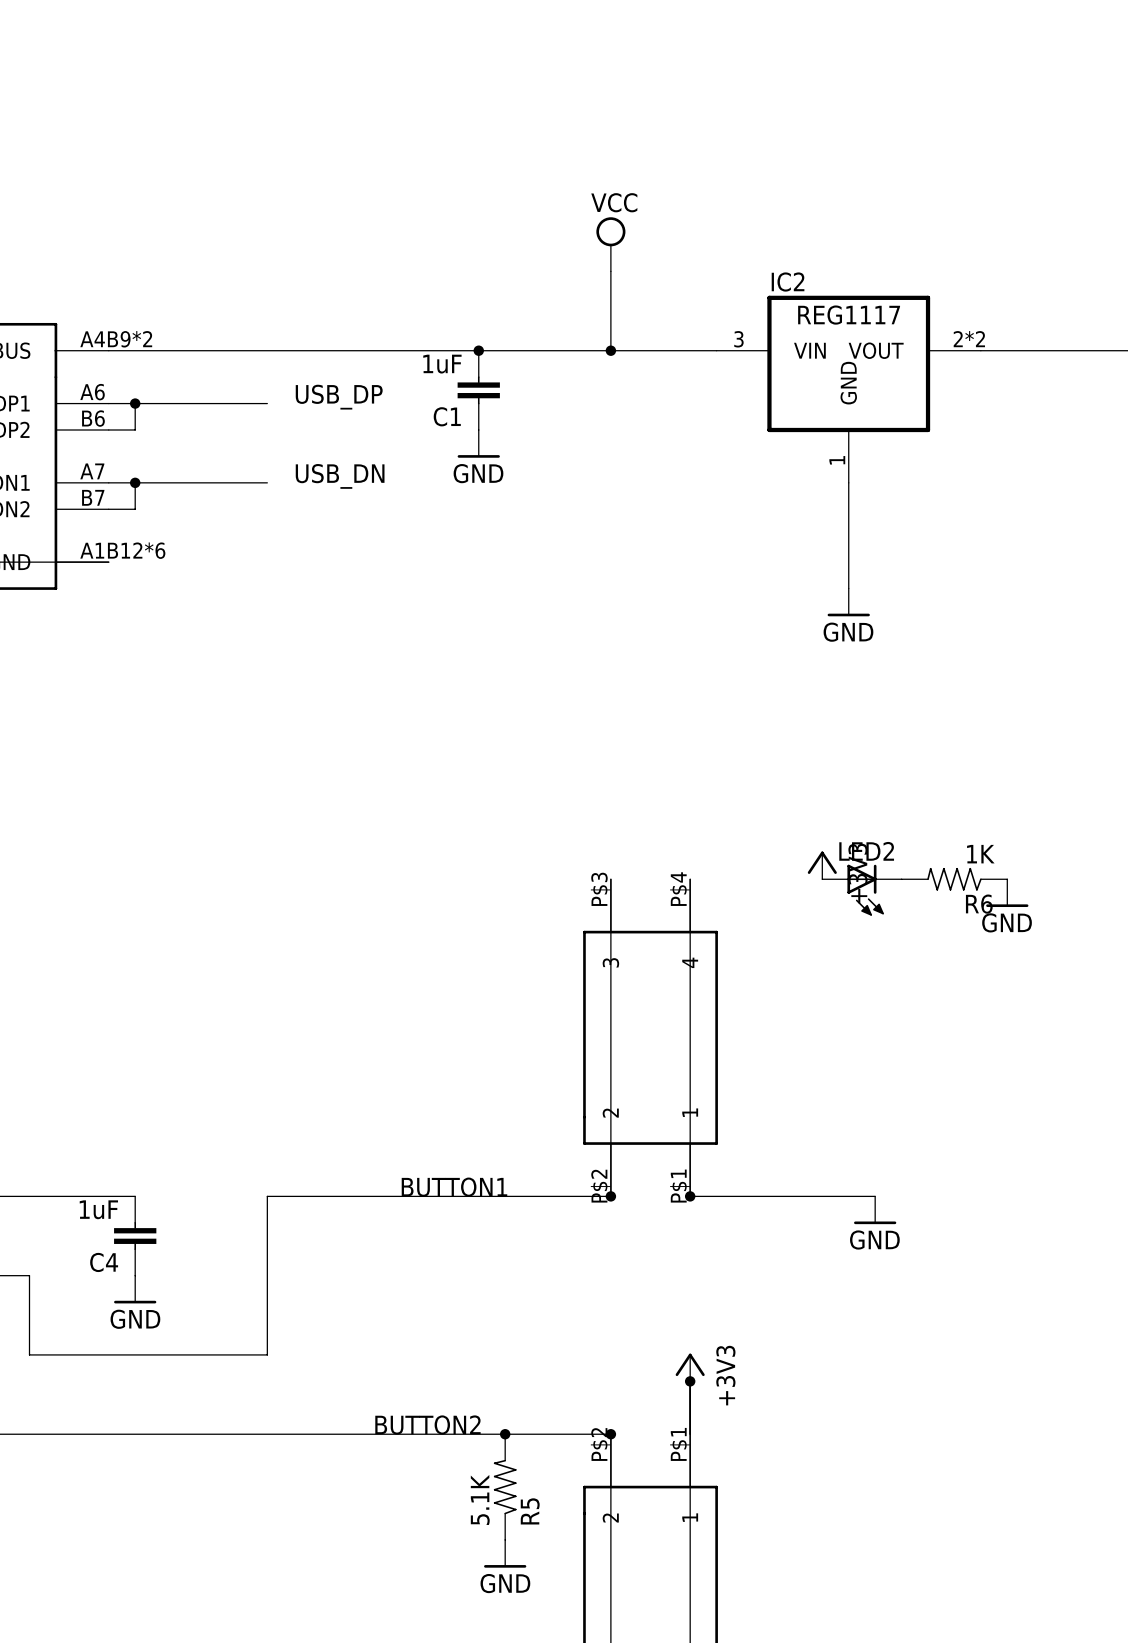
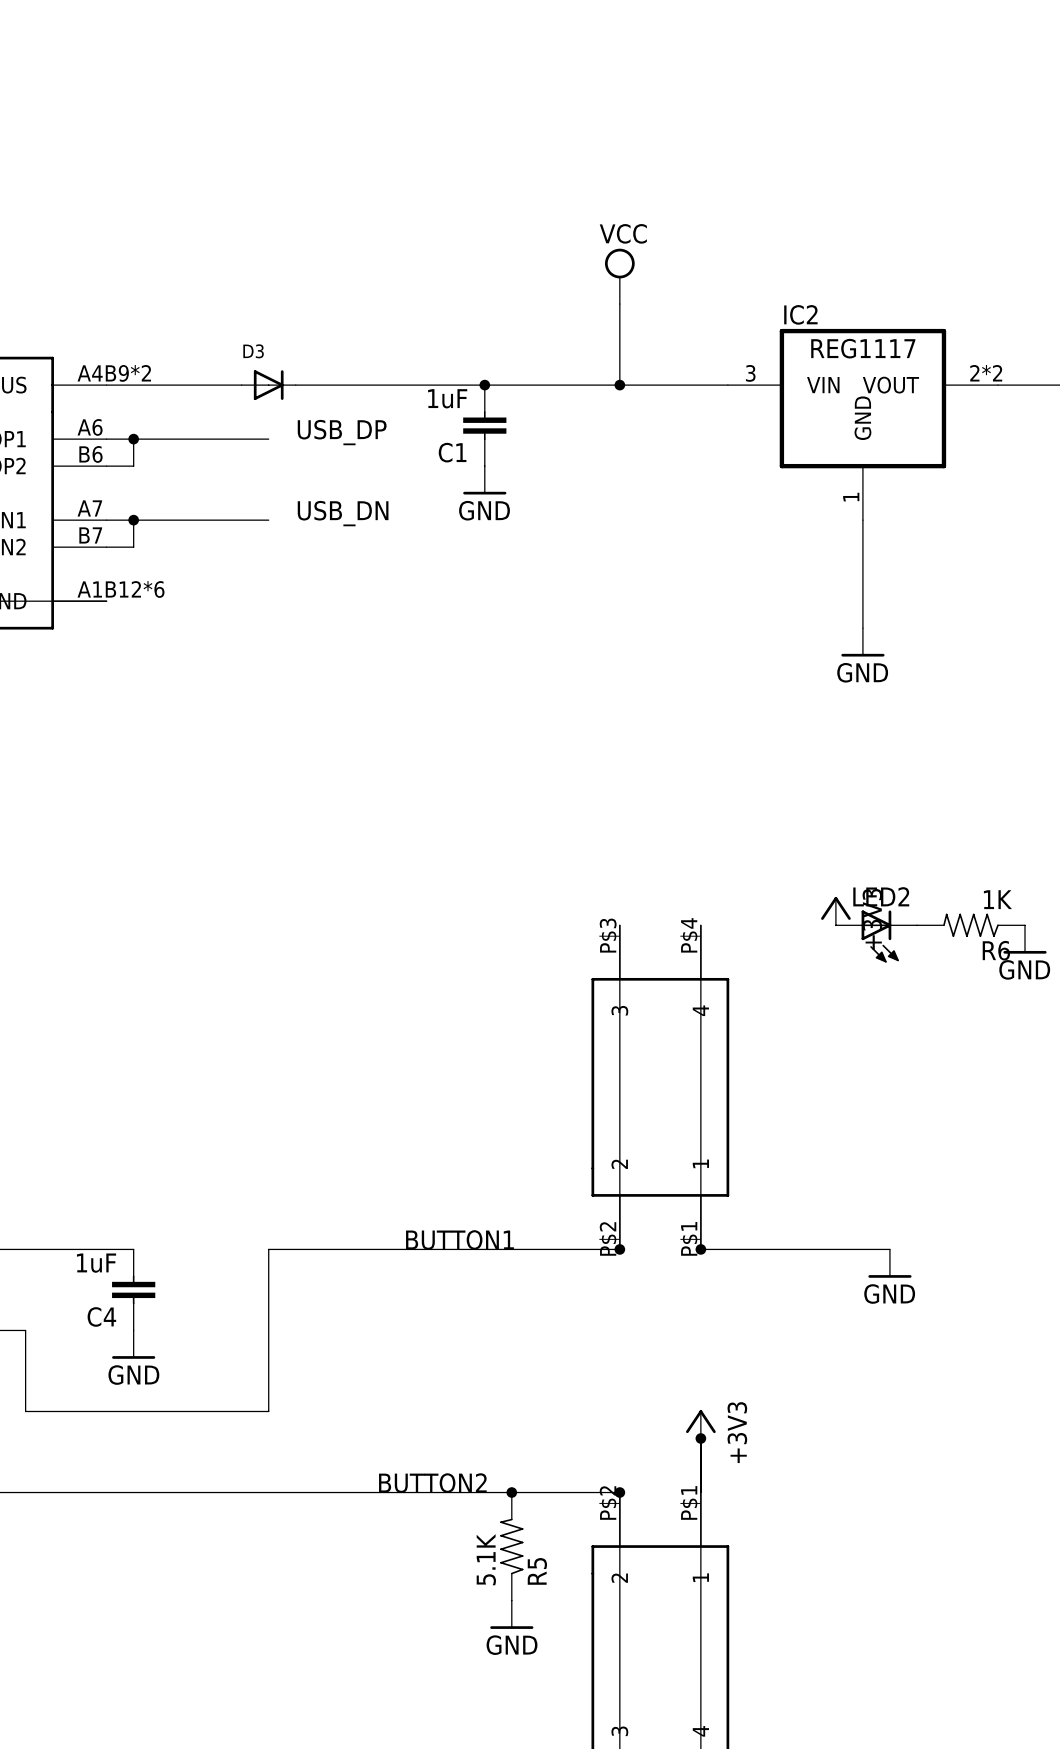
D3: none -> (268, 385)

